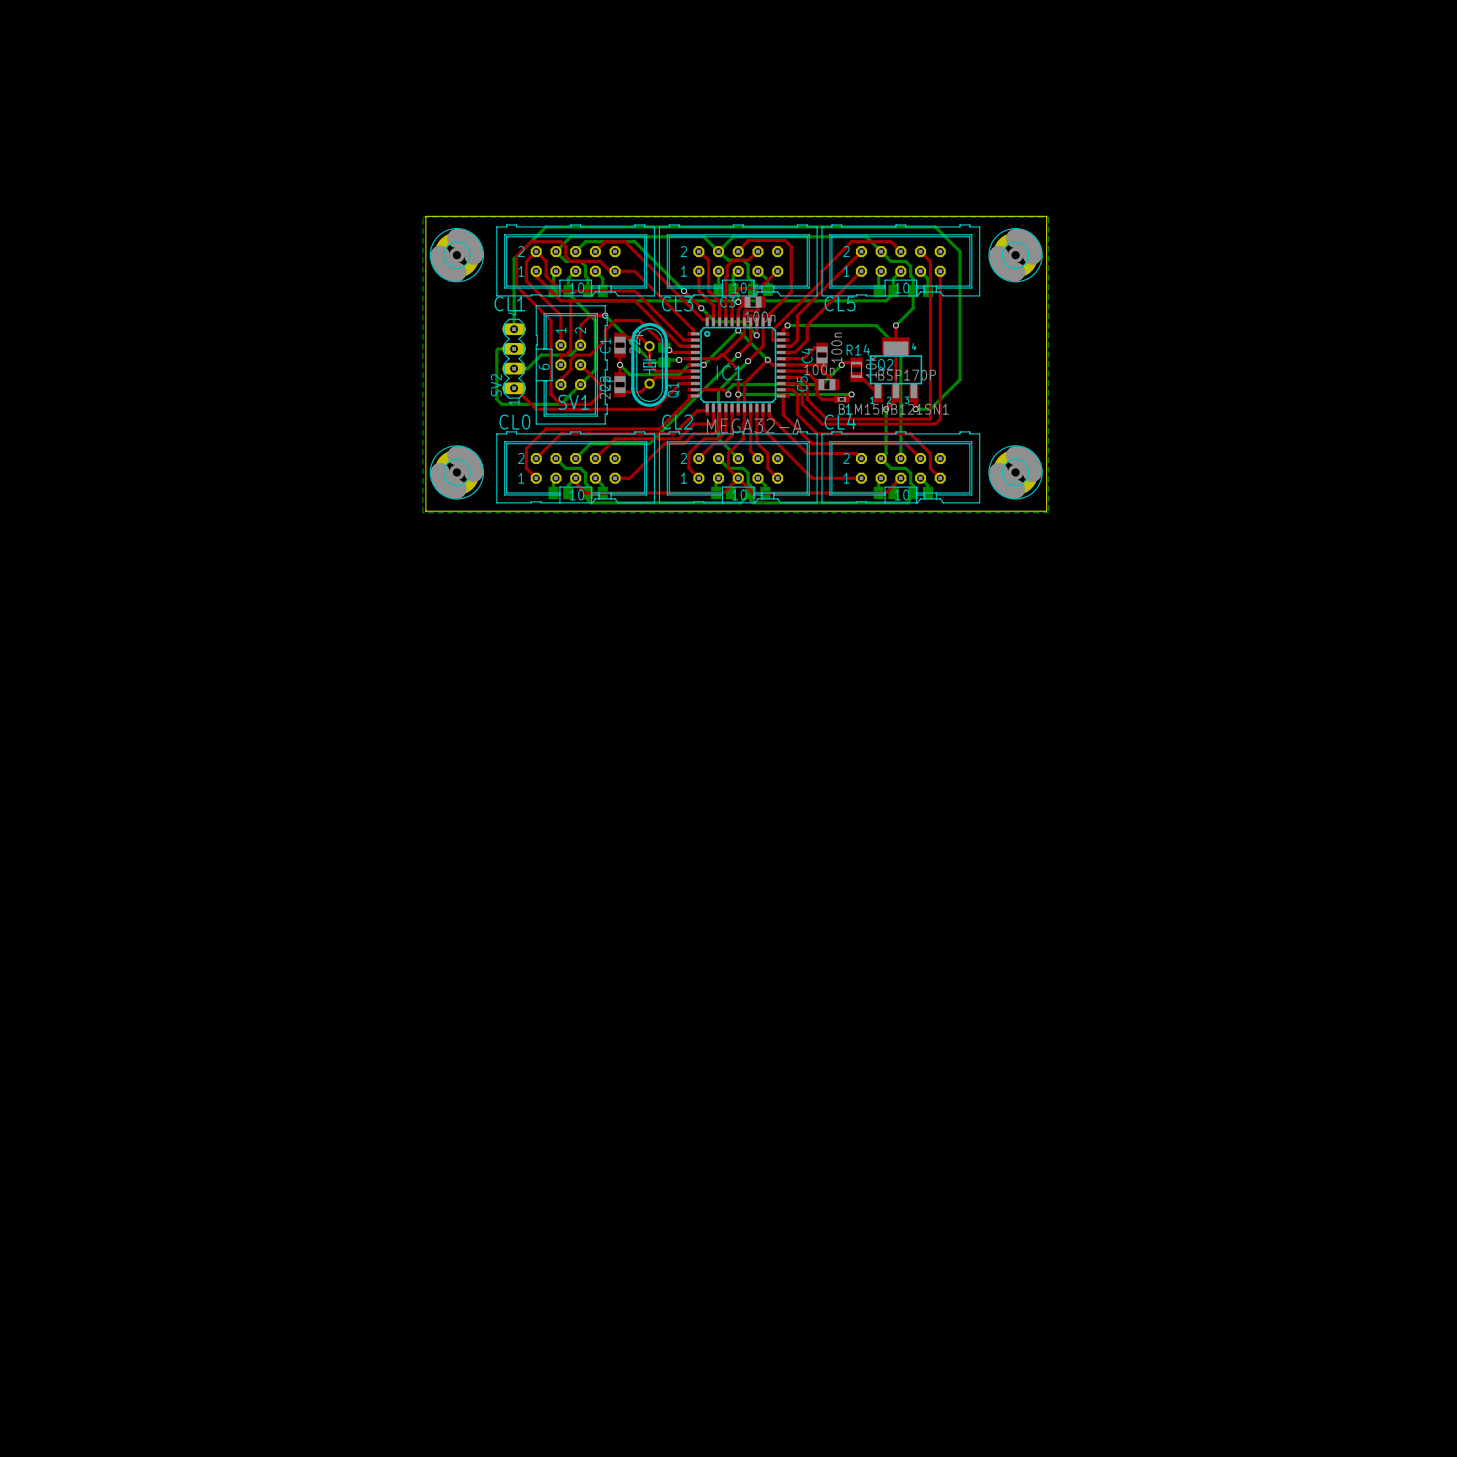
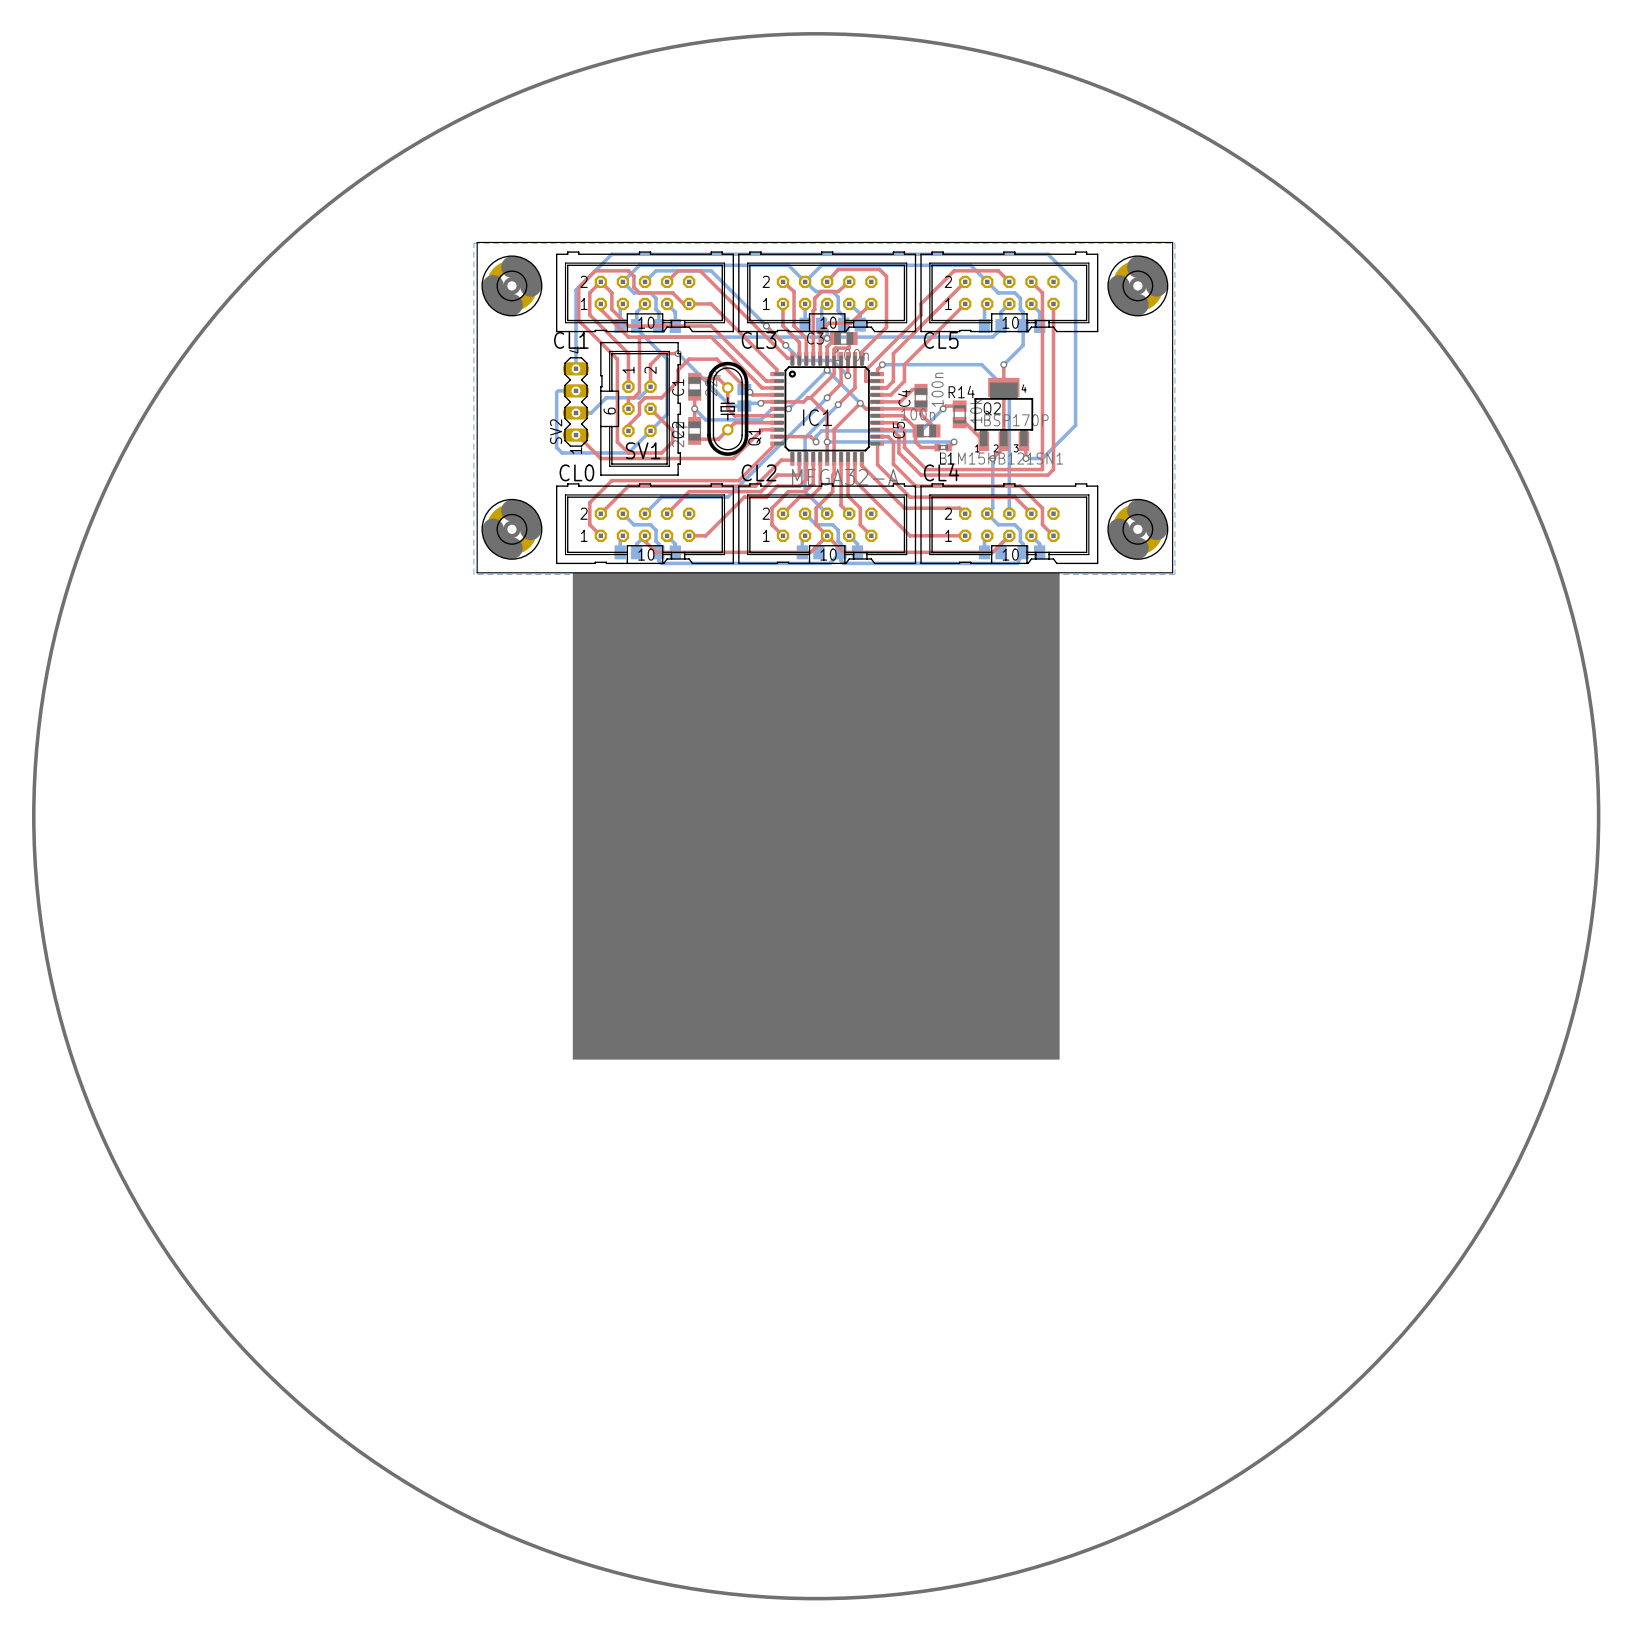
drawing: none -> [32, 32, 1601, 1601]

